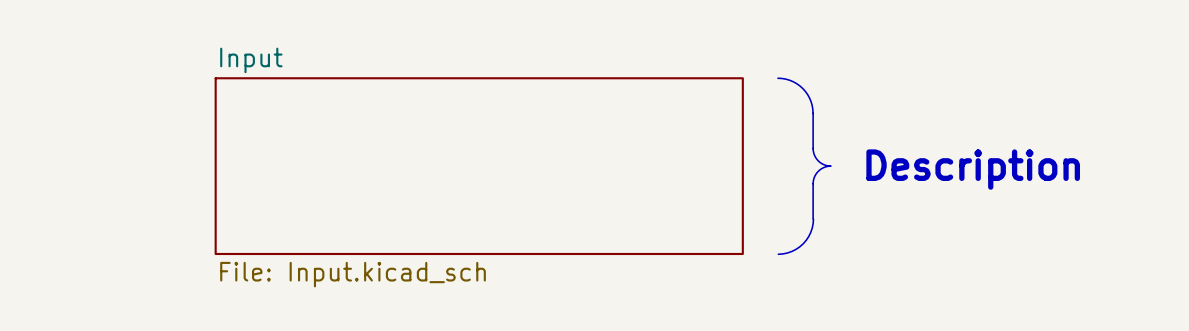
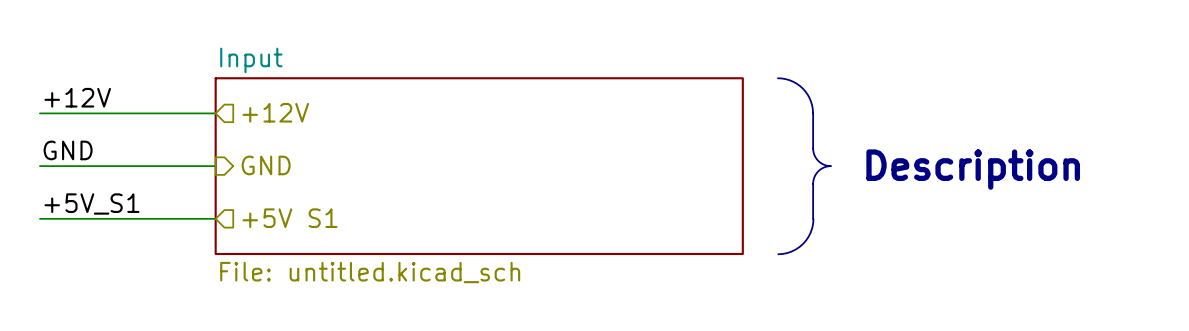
label: none -> +12V (77, 97)
hierarchical label: none -> +12V (275, 112)
wire: none -> (39, 113) (215, 113)
label: none -> GND (68, 150)
hierarchical label: none -> GND (266, 165)
wire: none -> (39, 166) (215, 166)
label: none -> +5V_S1 (91, 203)
wire: none -> (39, 218) (215, 218)
hierarchical label: none -> +5V S1 (290, 218)
sheet Input value: File: Input.kicad_sch (353, 274) -> File: untitled.kicad_sch (370, 272)

